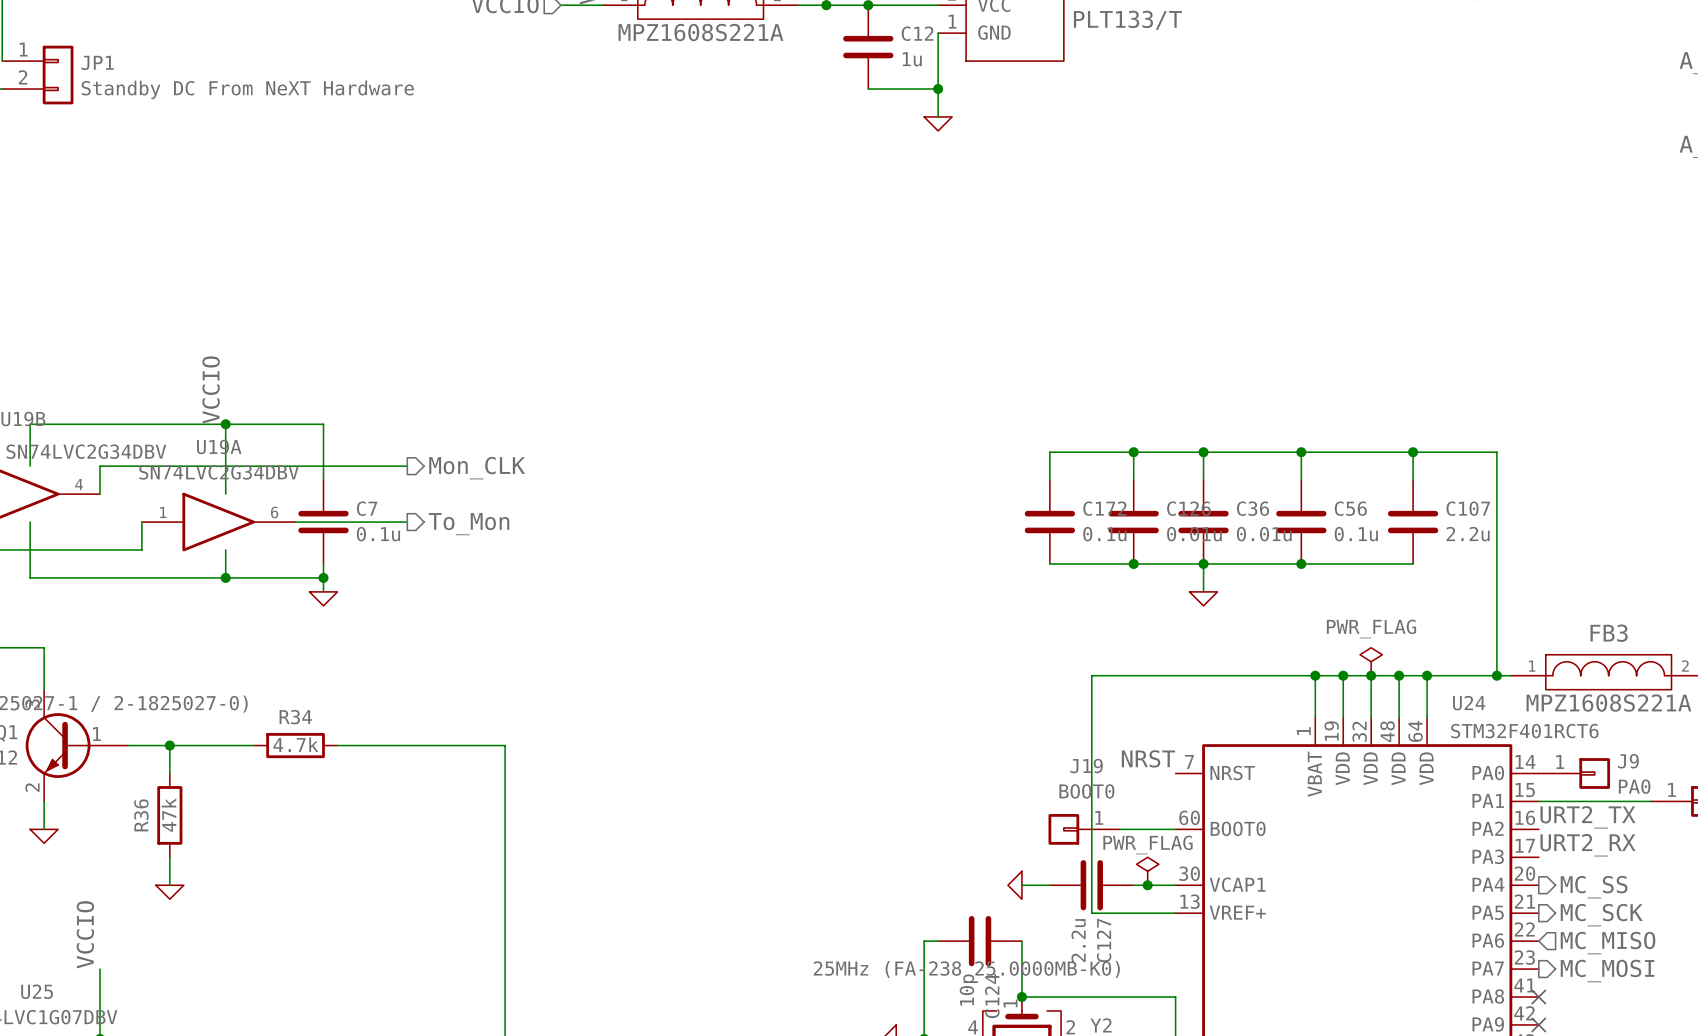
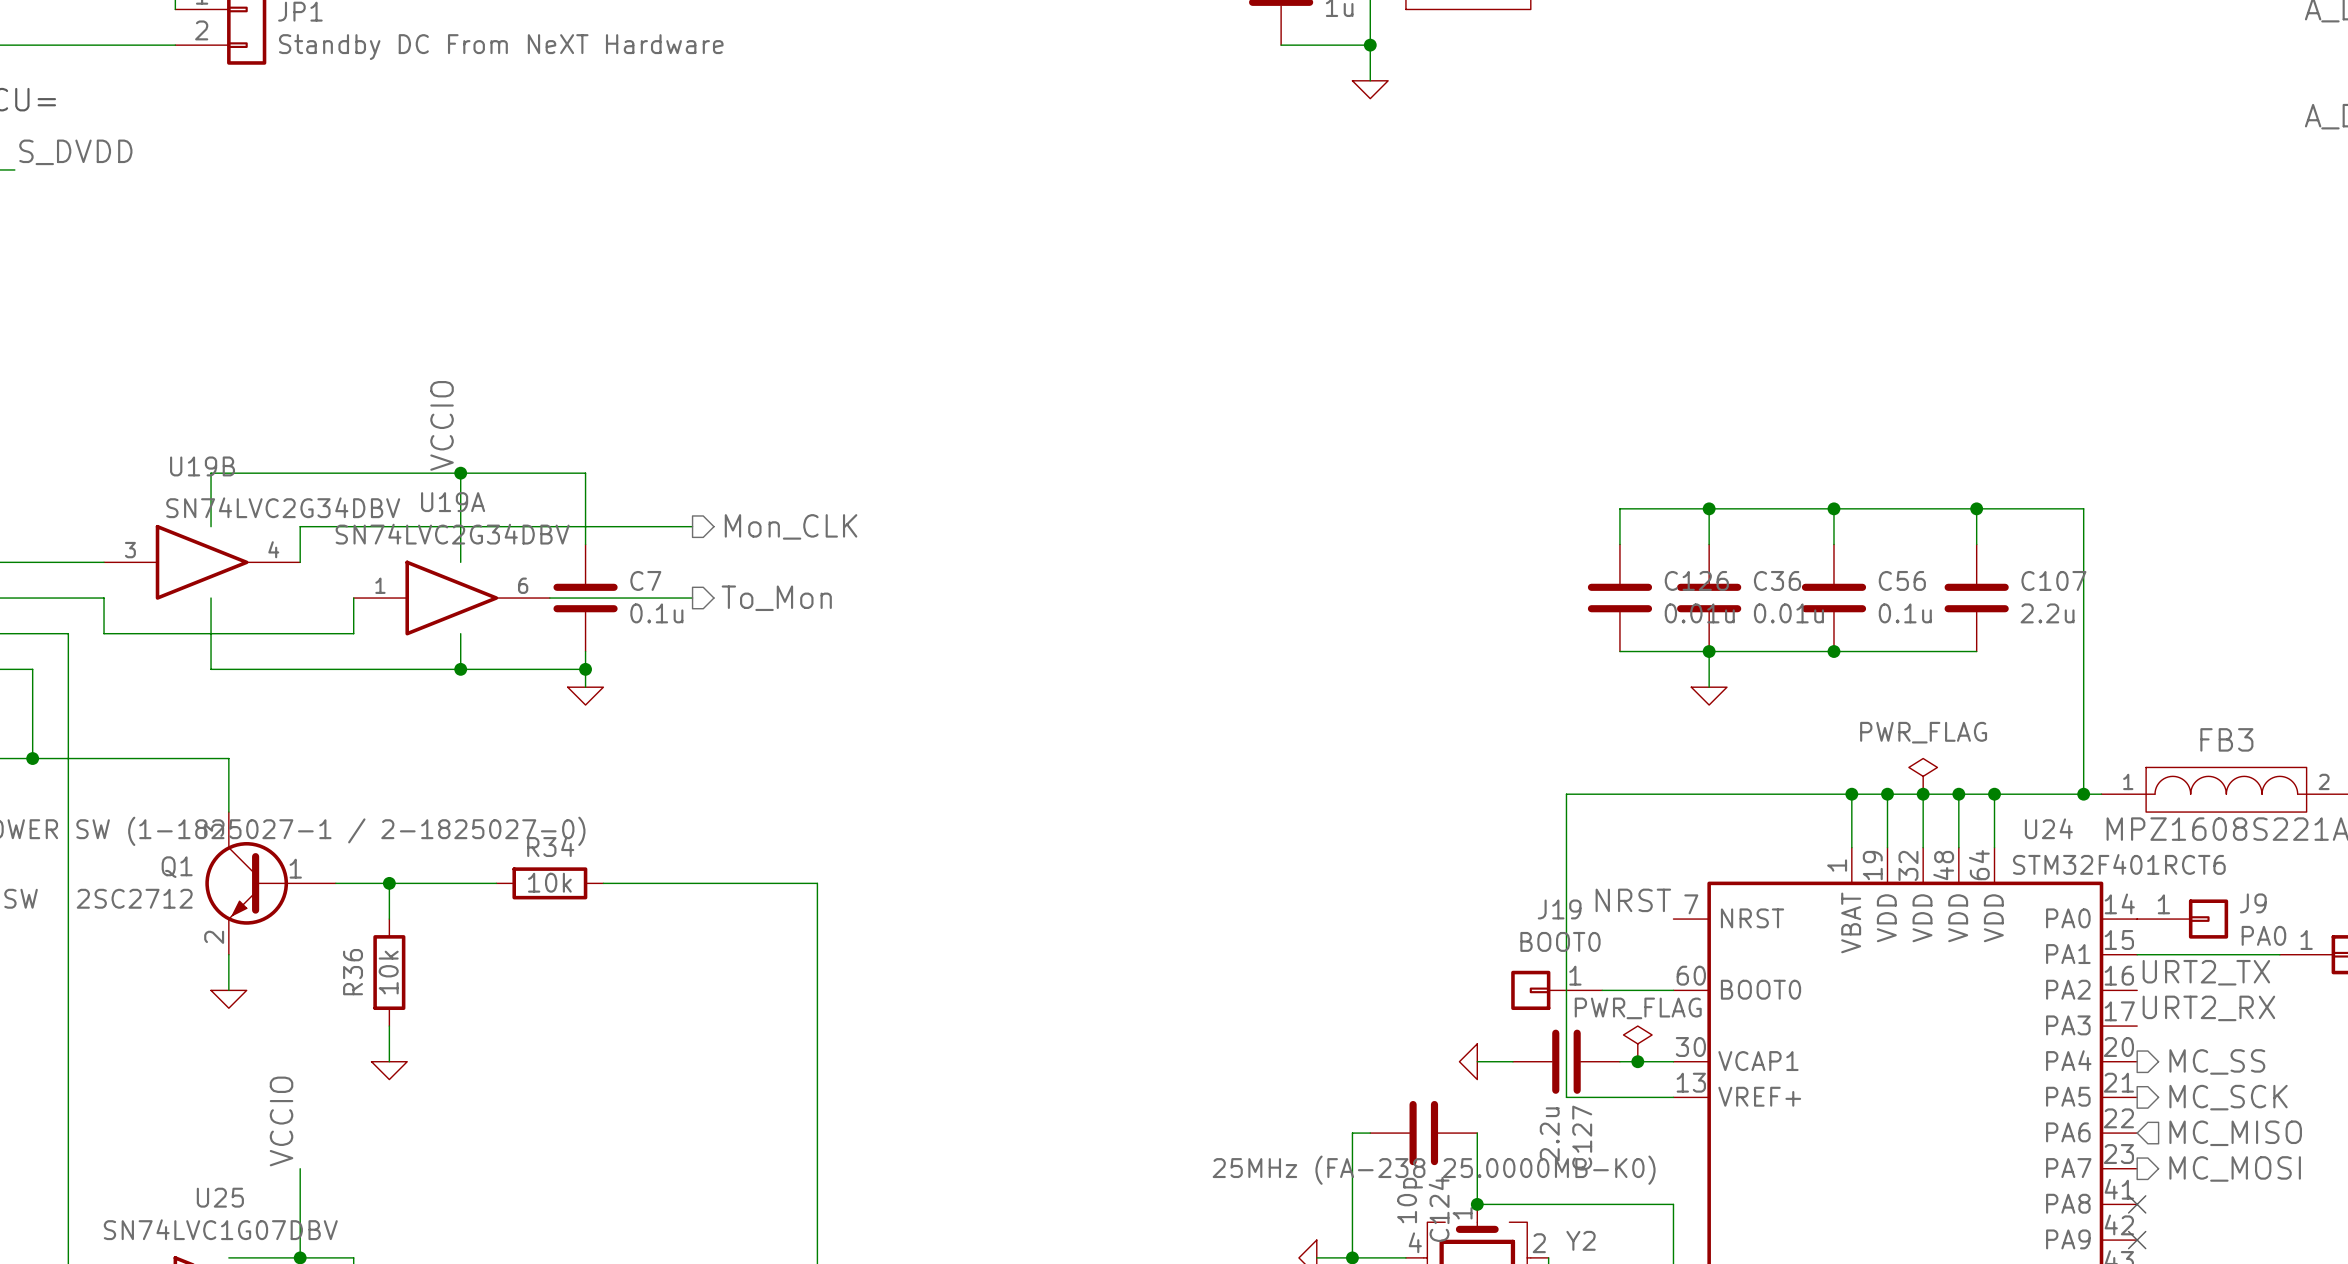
wire: (1133, 452) (1049, 452) (1049, 480) -> none
junction: (1133, 452) -> none
C172: 0.1u (1049, 522) -> none
wire: (1049, 563) (1133, 563) -> none
junction: (1133, 563) -> none
R34 value: 4.7k (295, 744) -> 10k (549, 882)
R36 value: 47k (169, 815) -> 10k (388, 972)

